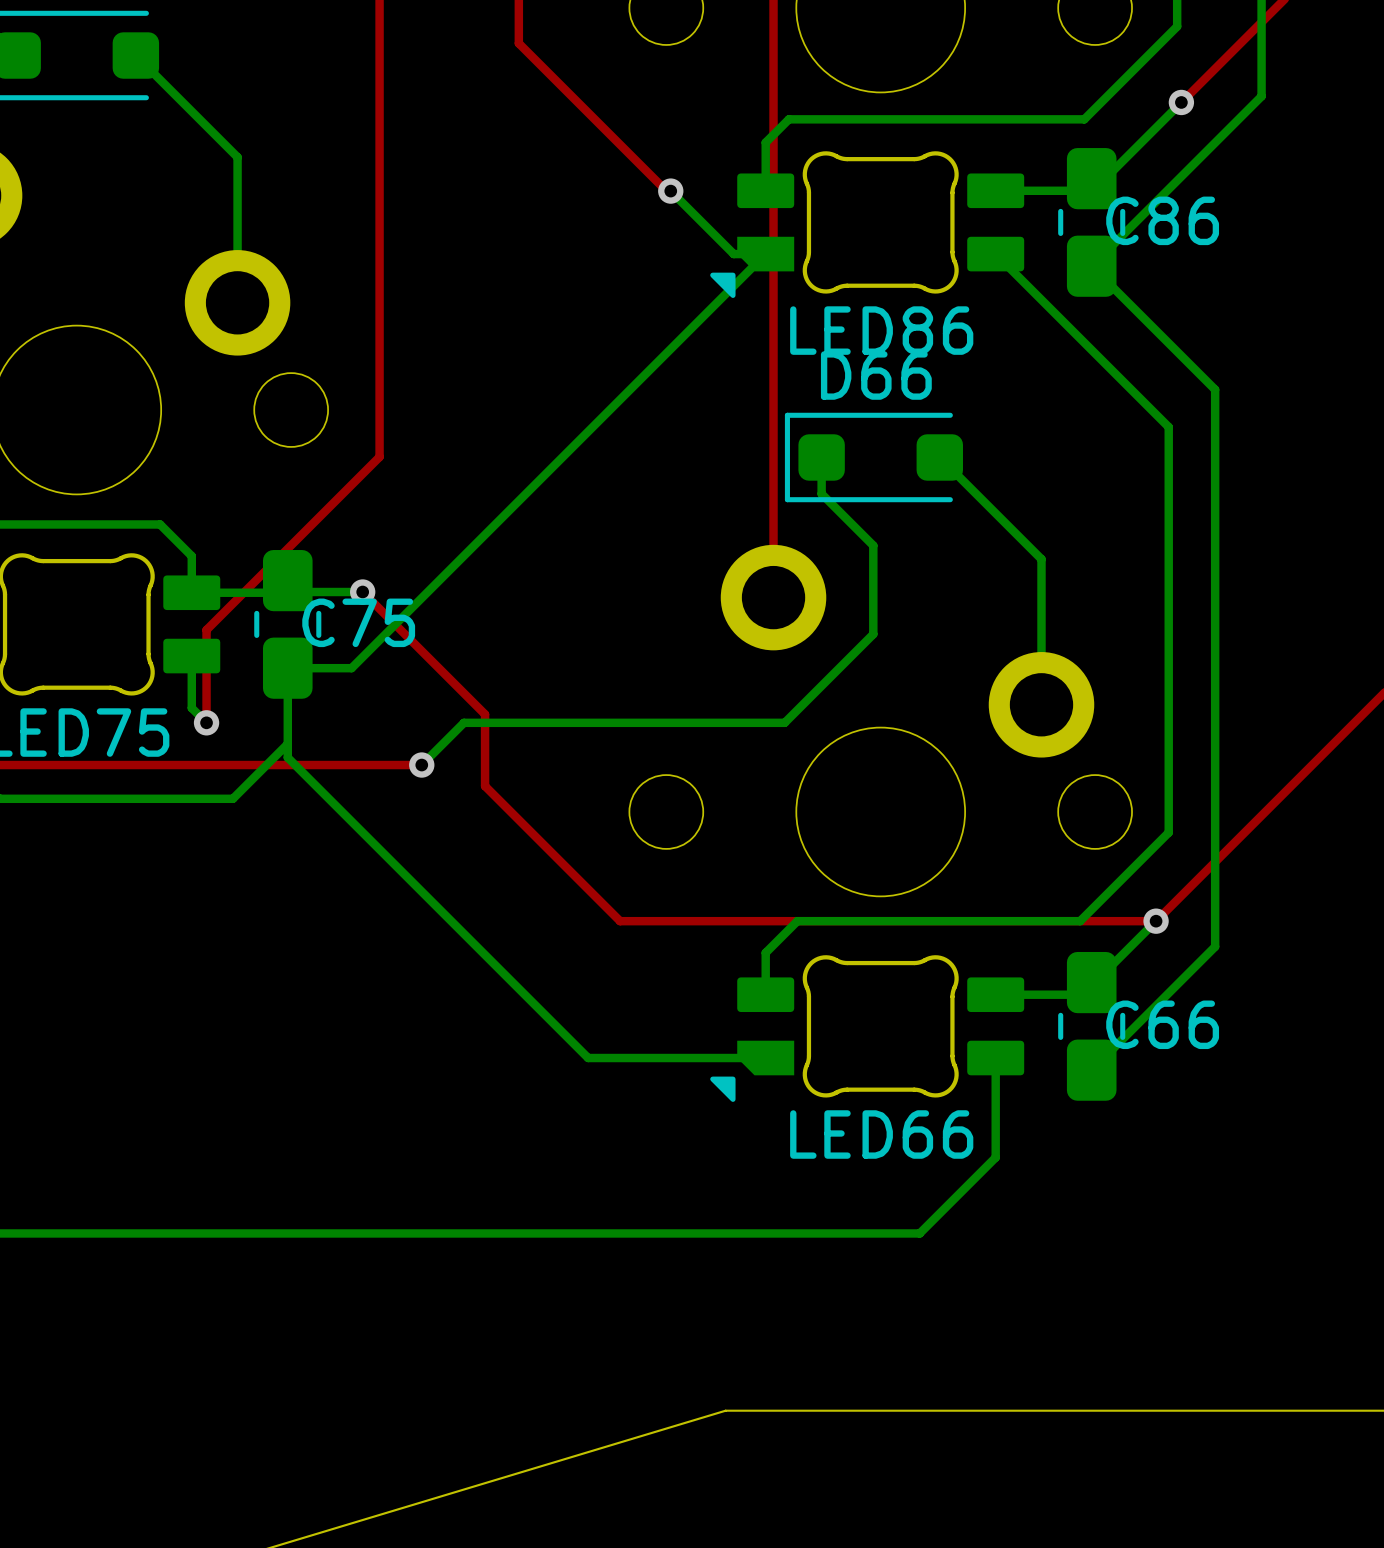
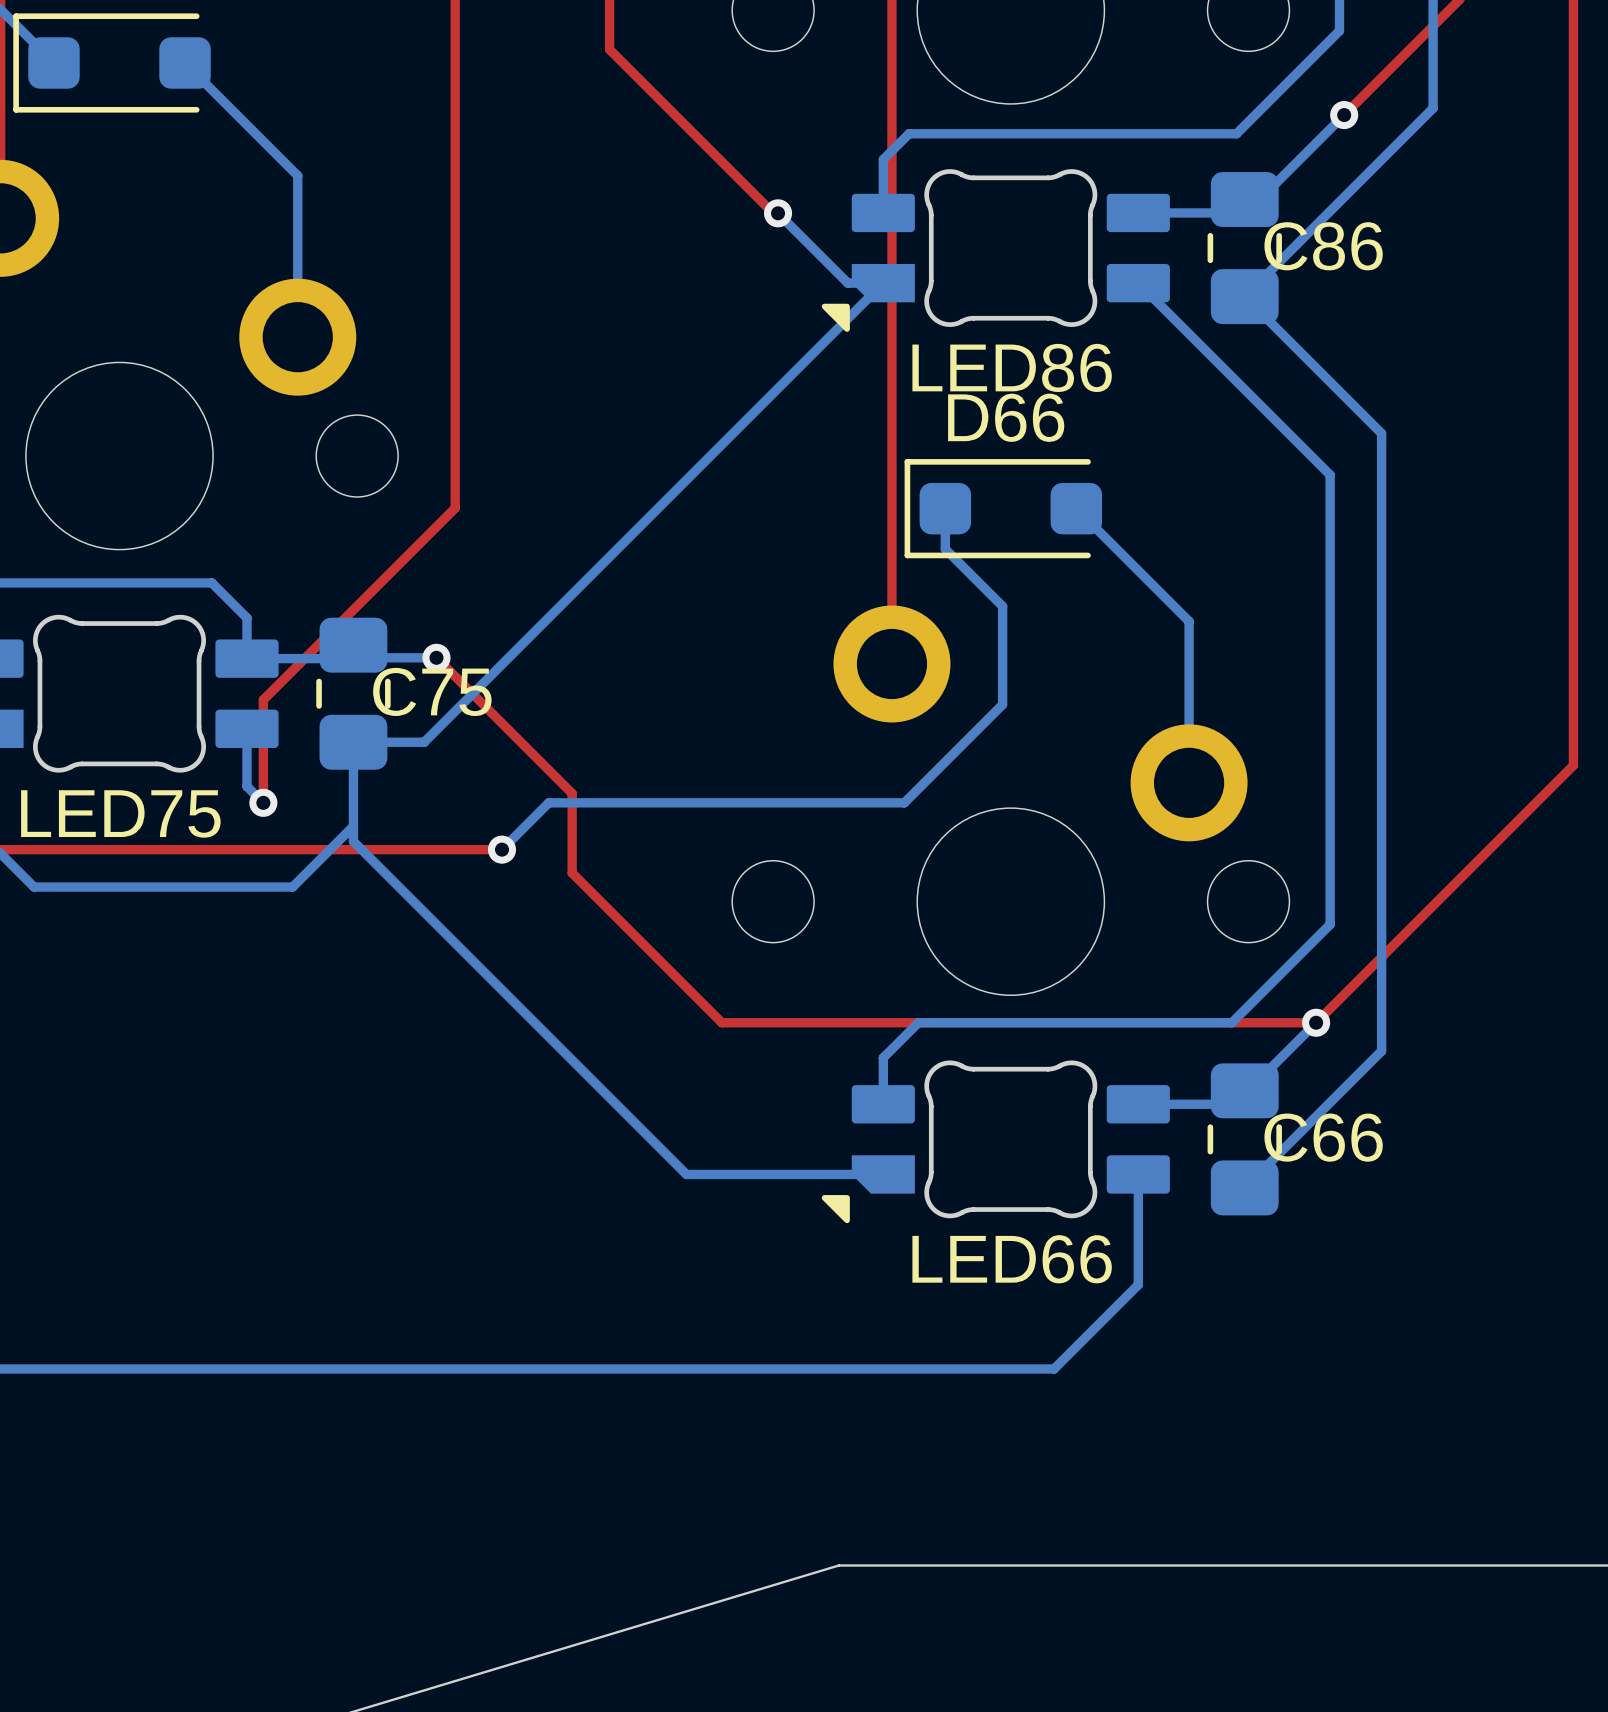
C86 footprint: [1058, 148, 1126, 297] -> [1207, 172, 1282, 325]
C75 footprint: [254, 550, 322, 699] -> [316, 617, 391, 770]
C66 footprint: [1058, 951, 1126, 1101] -> [1207, 1063, 1282, 1216]

